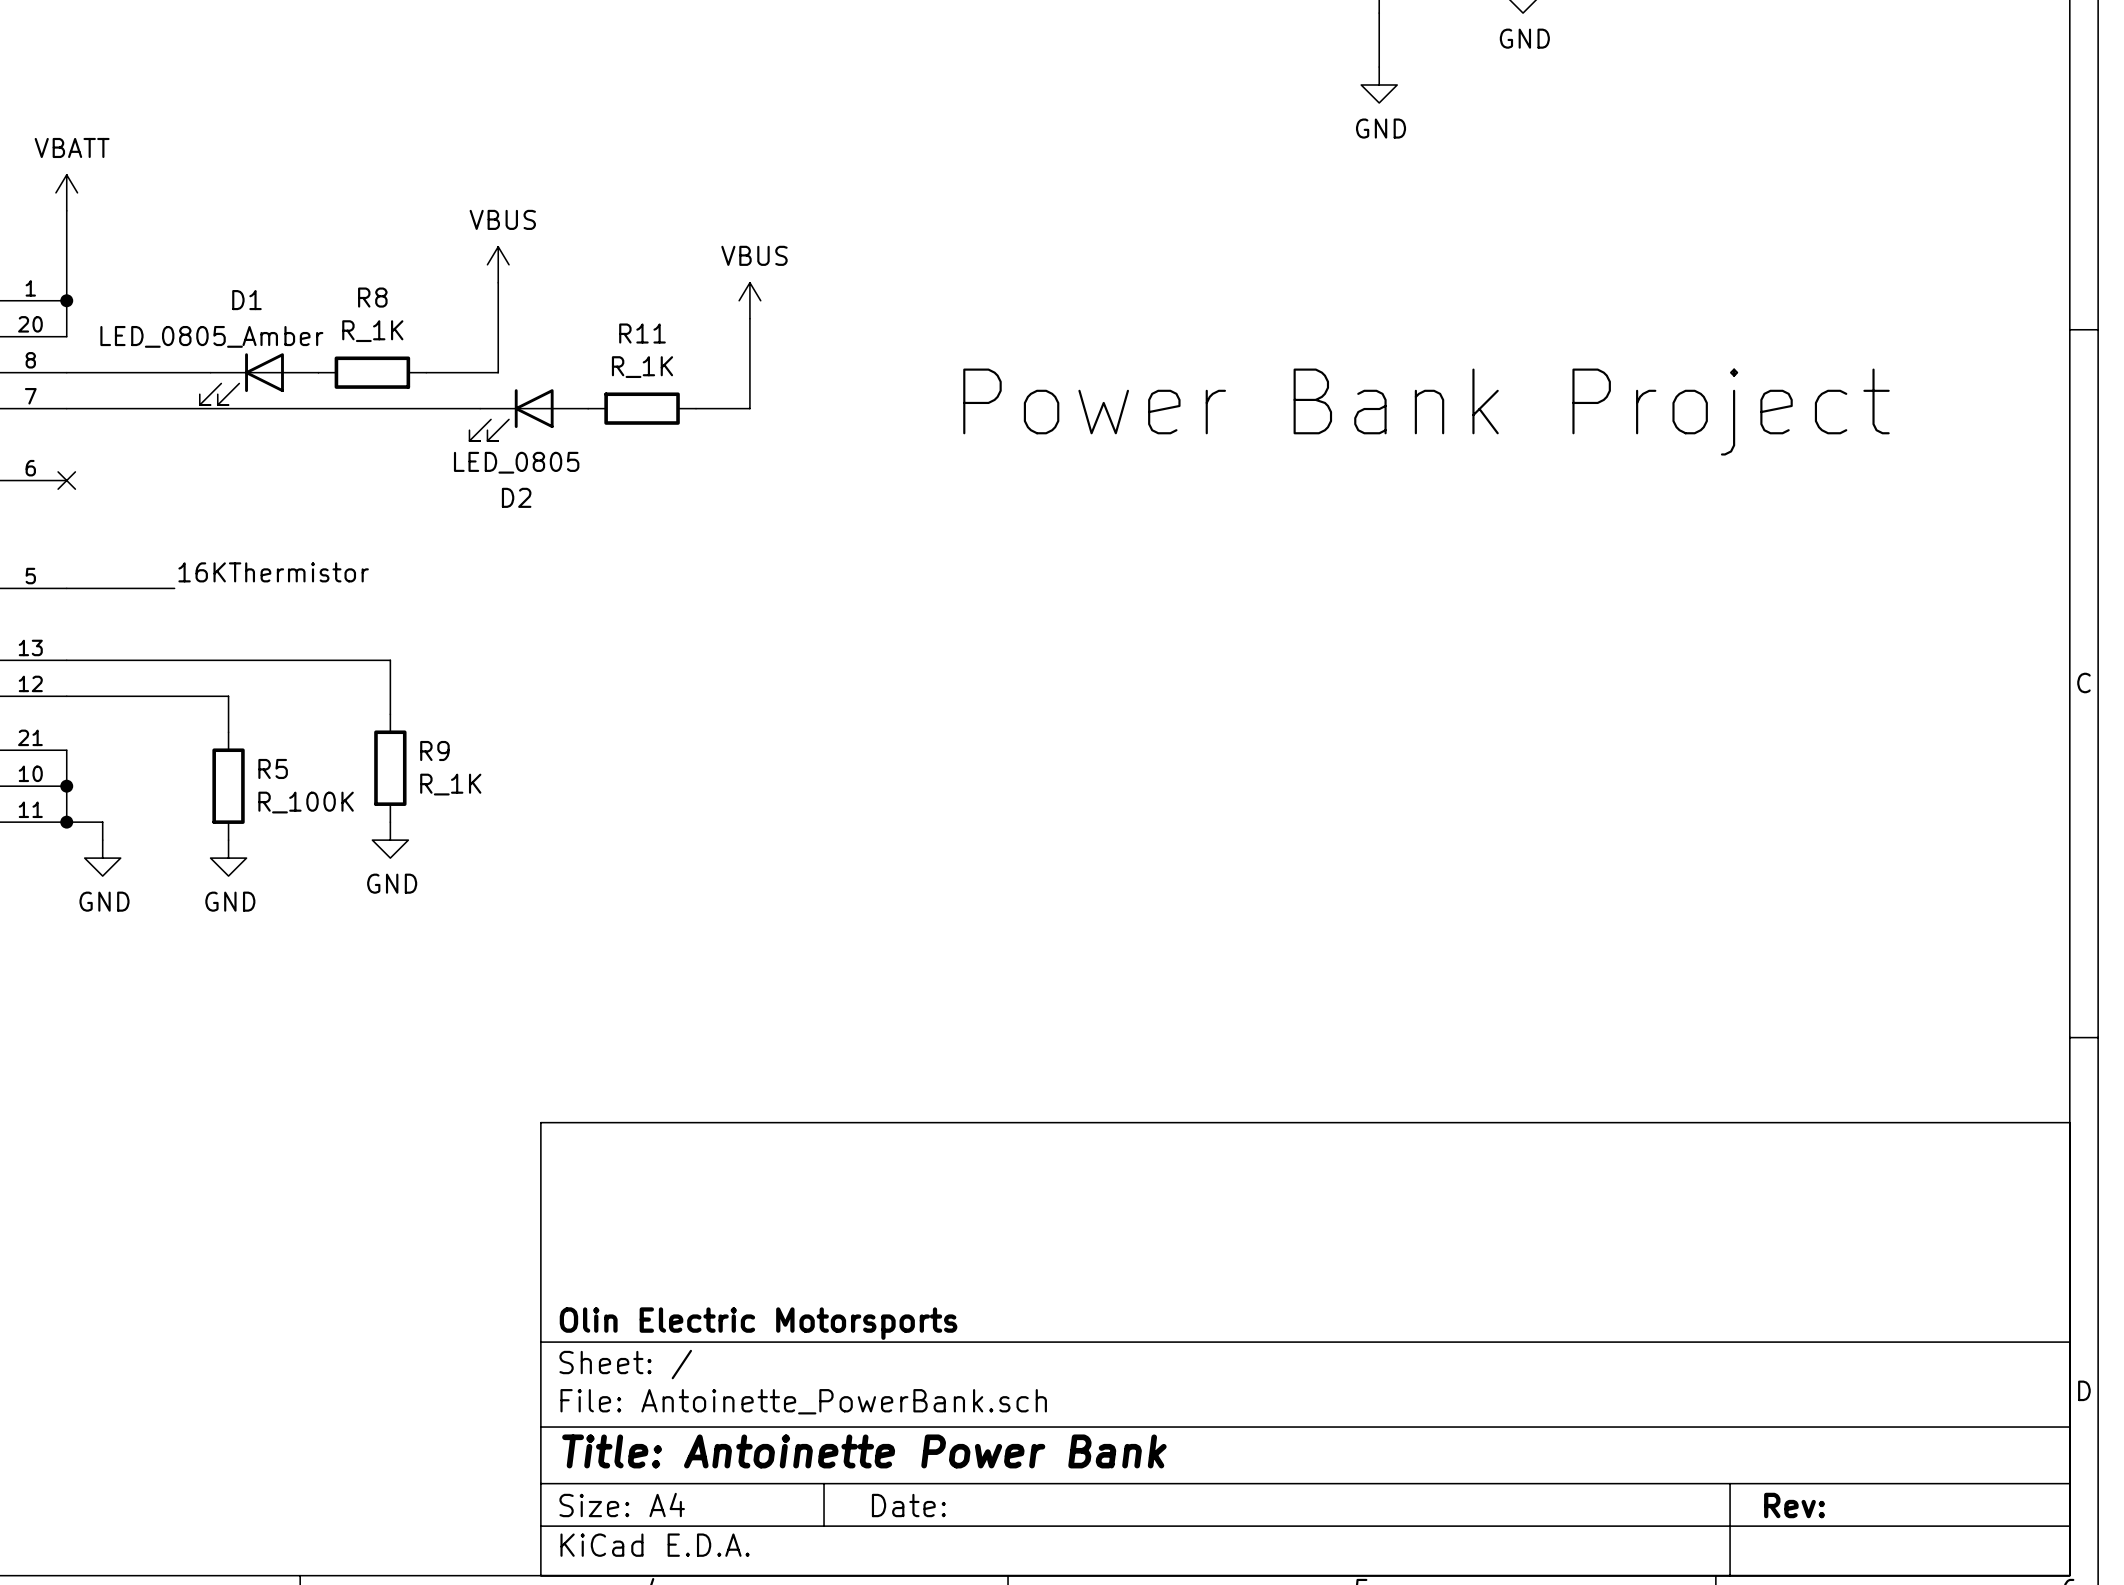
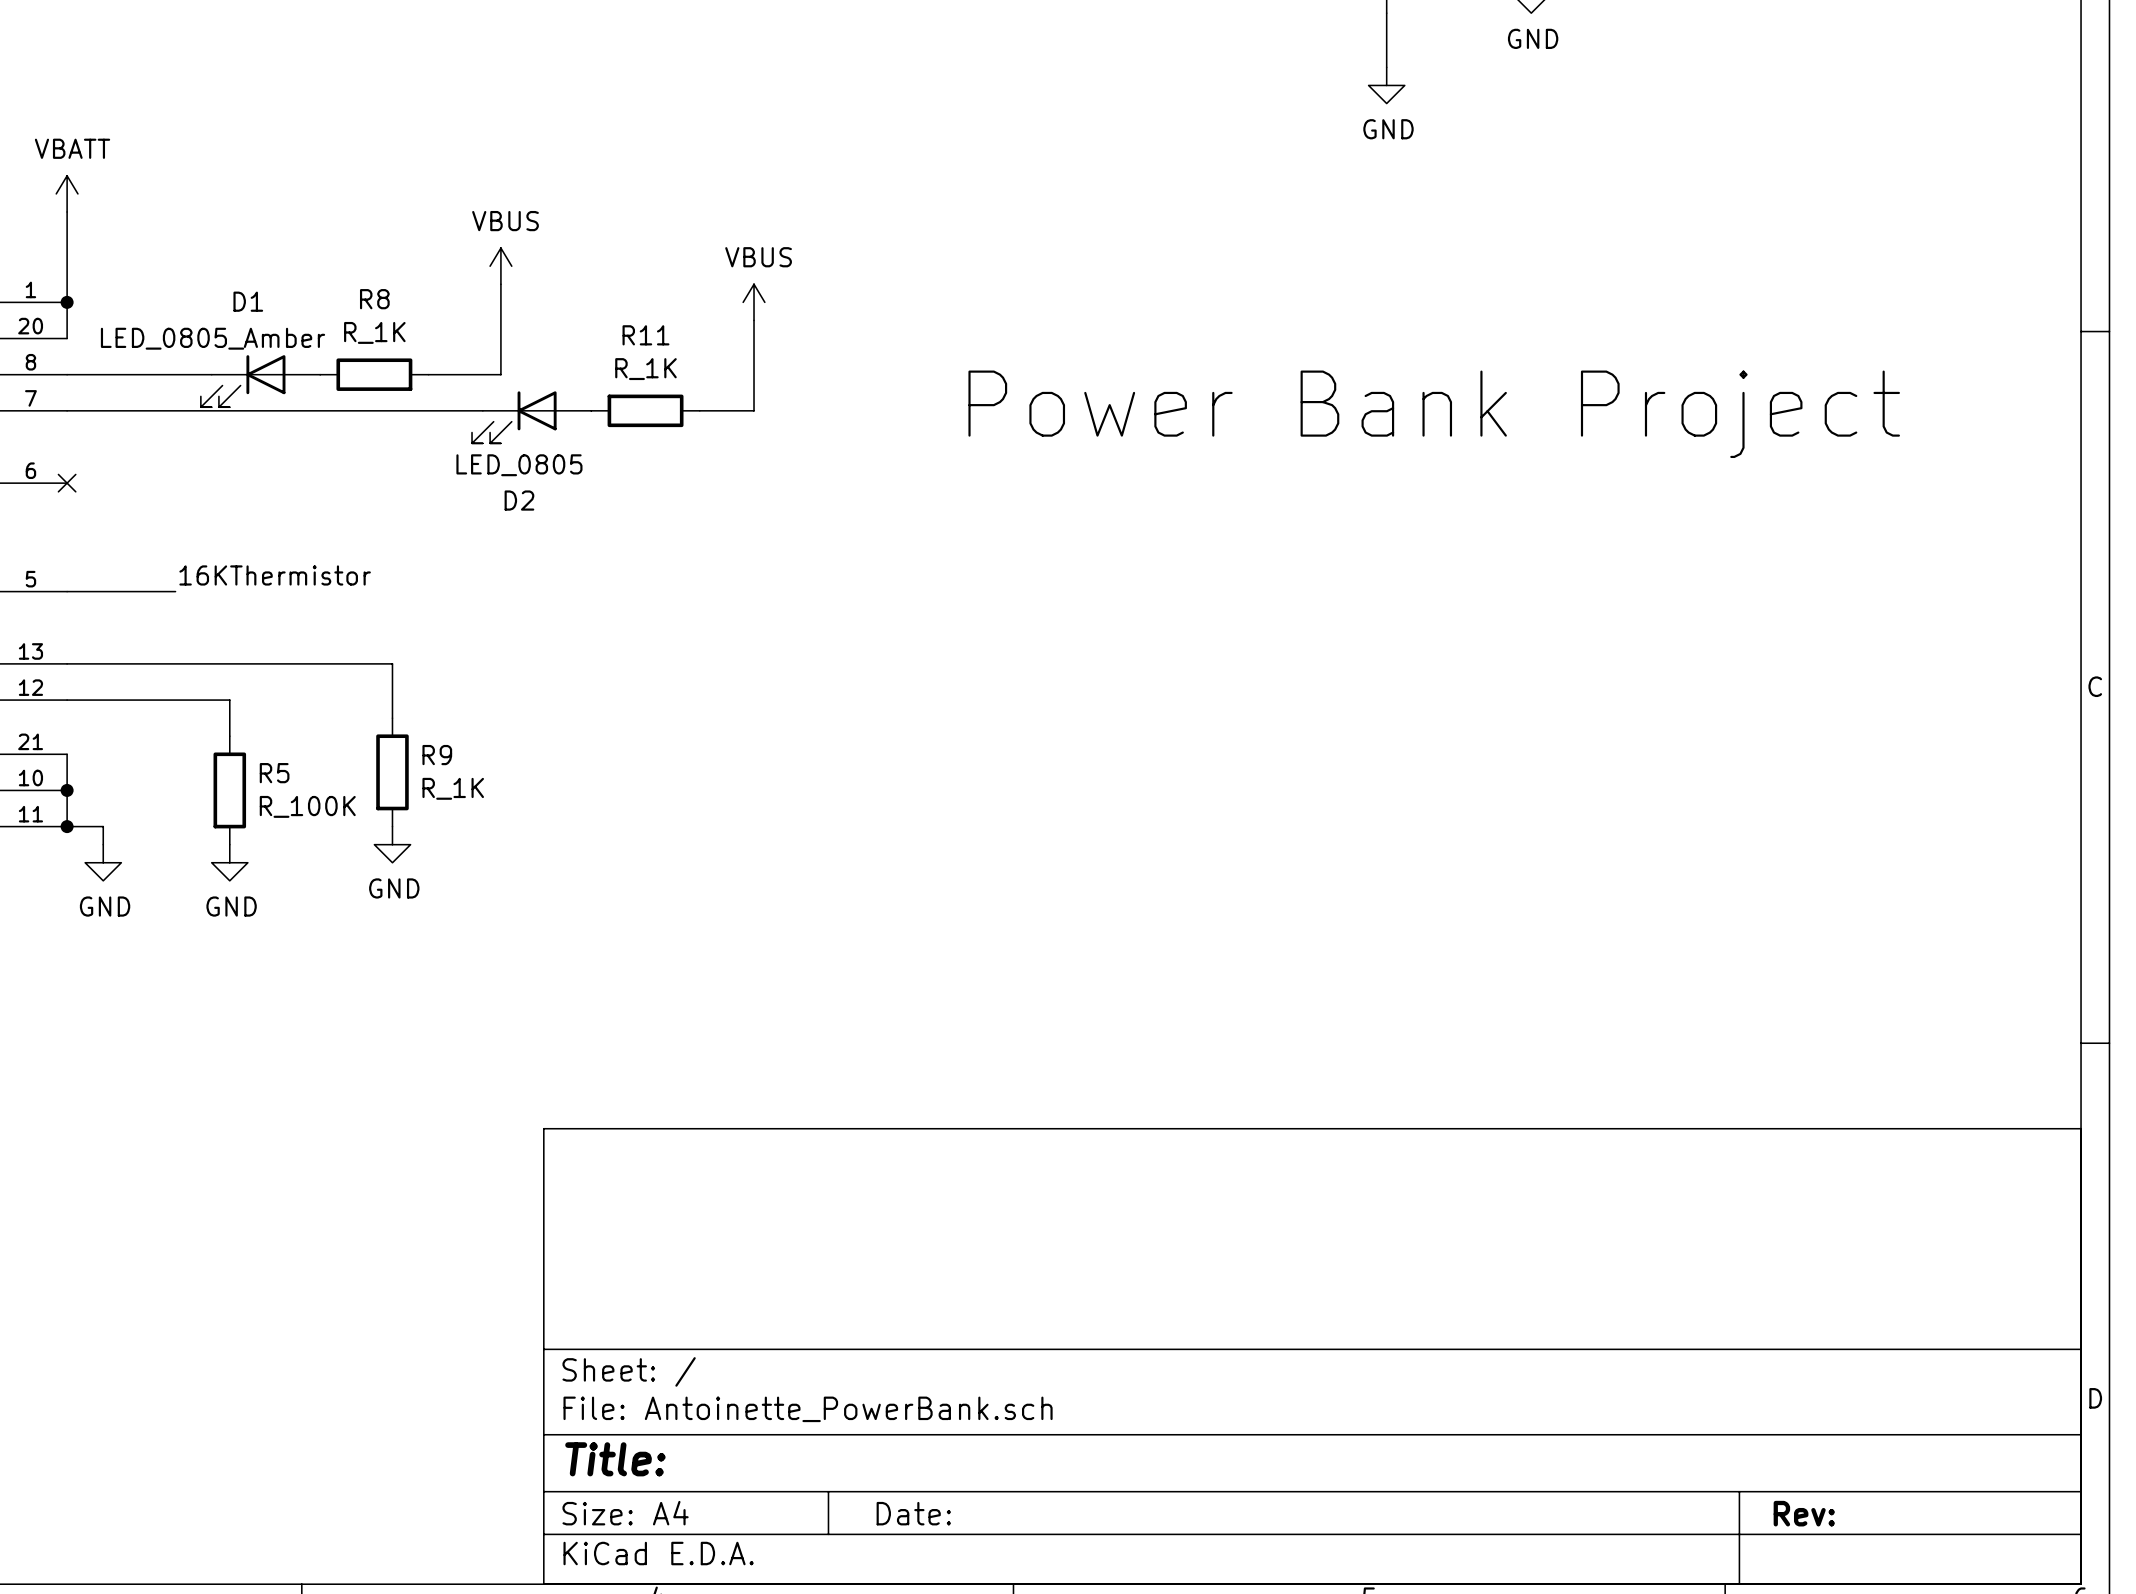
title block: Olin Electric Motorsports (758, 1323) -> none
title block: Title: Antoinette Power Bank (864, 1451) -> Title: (615, 1459)

